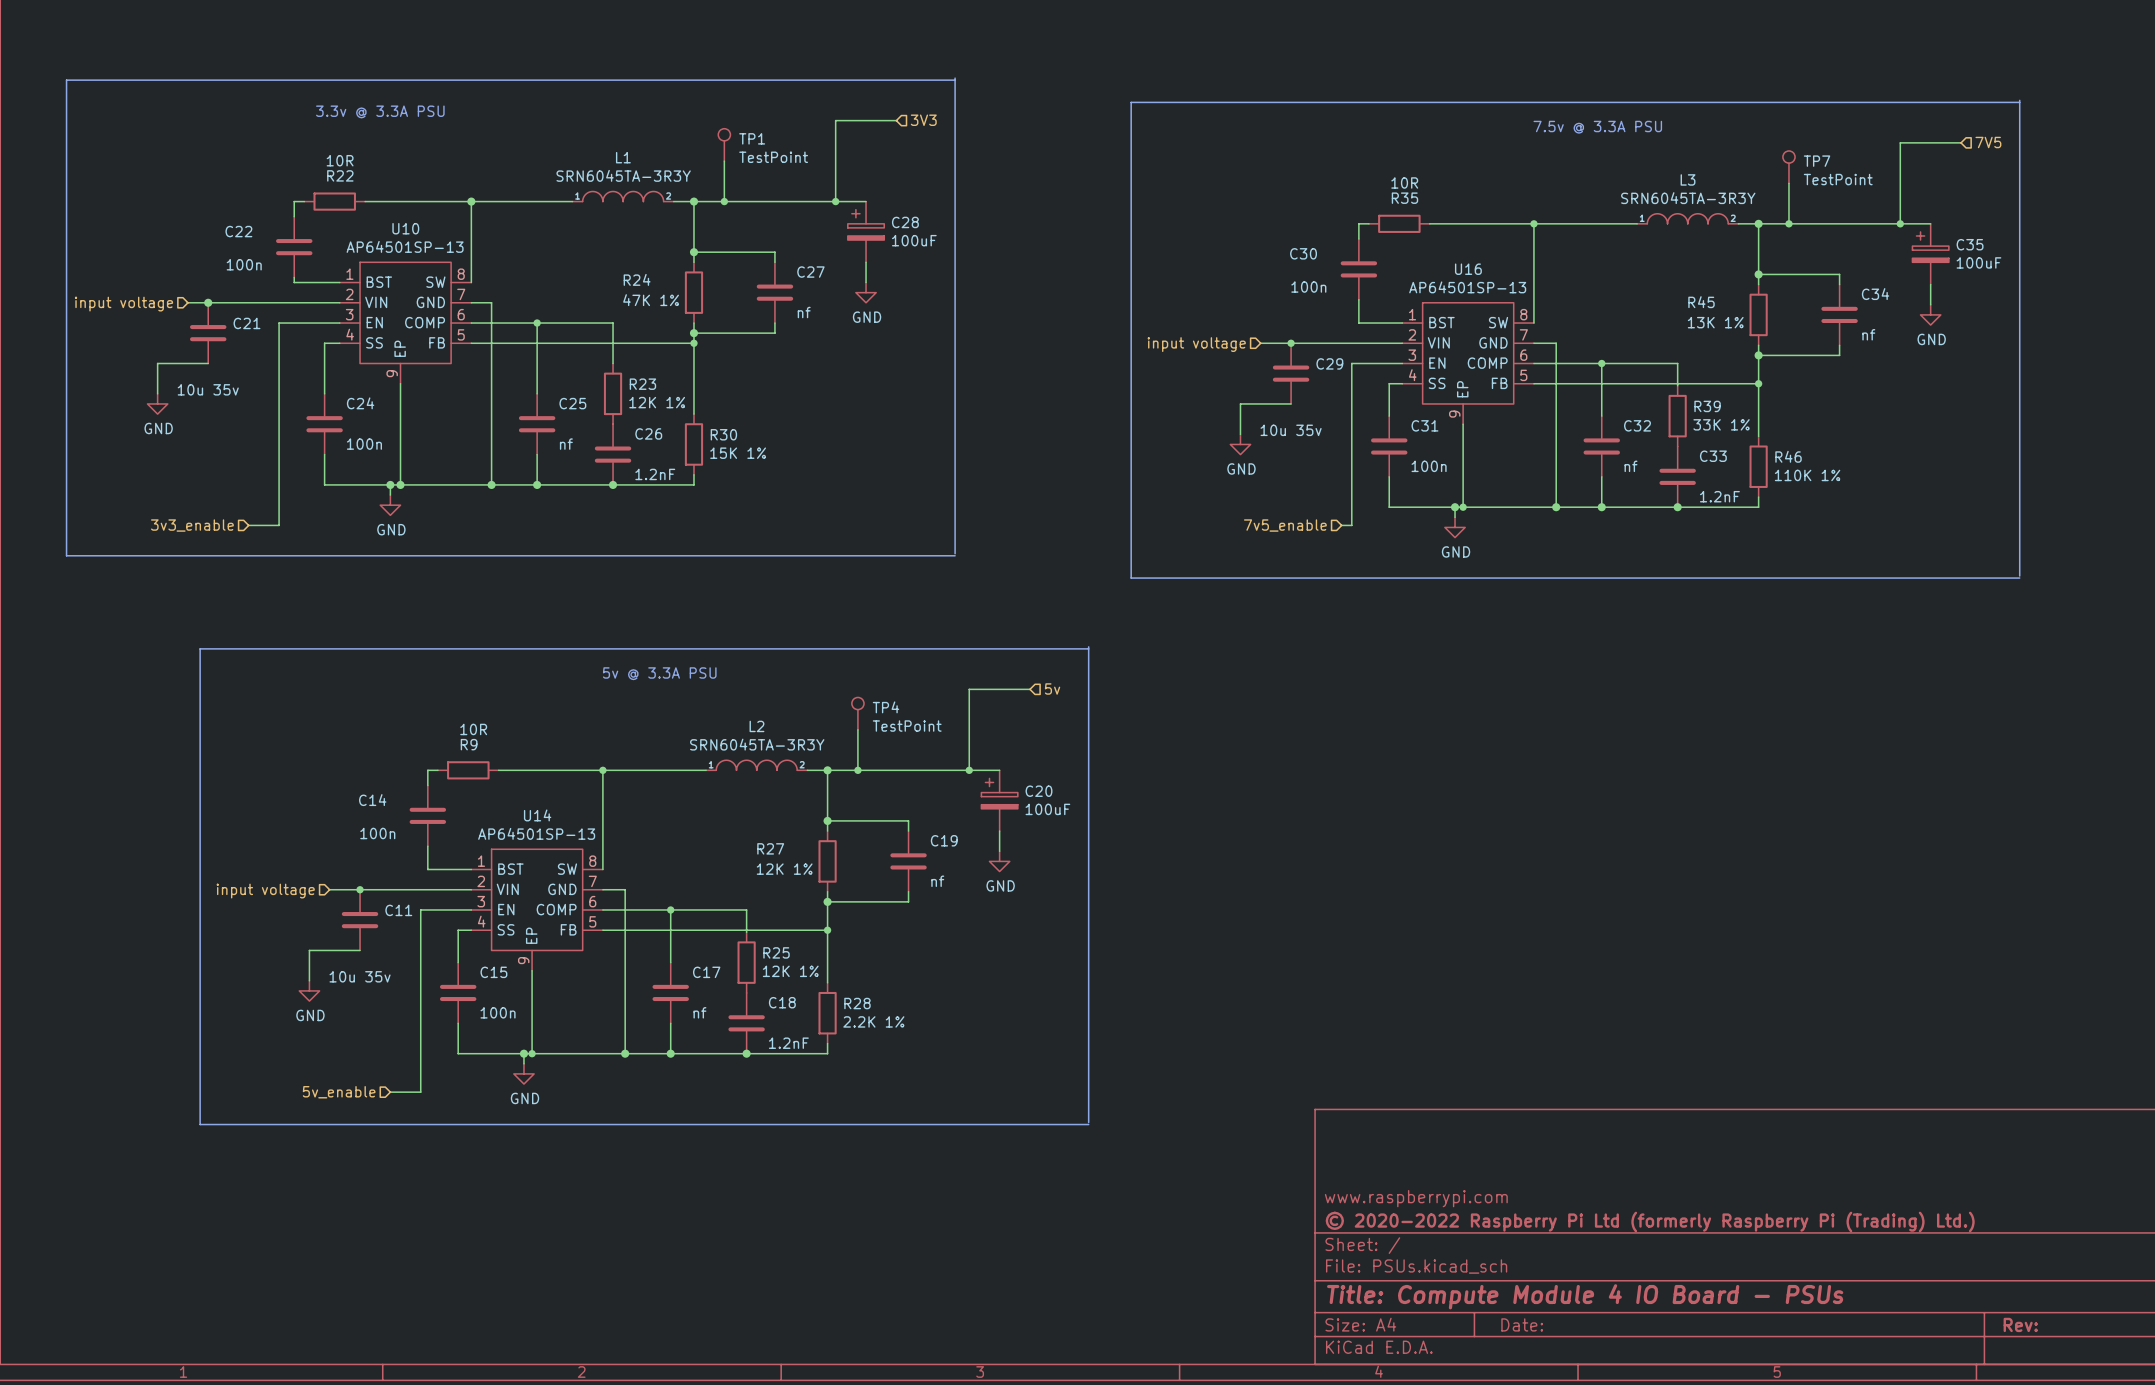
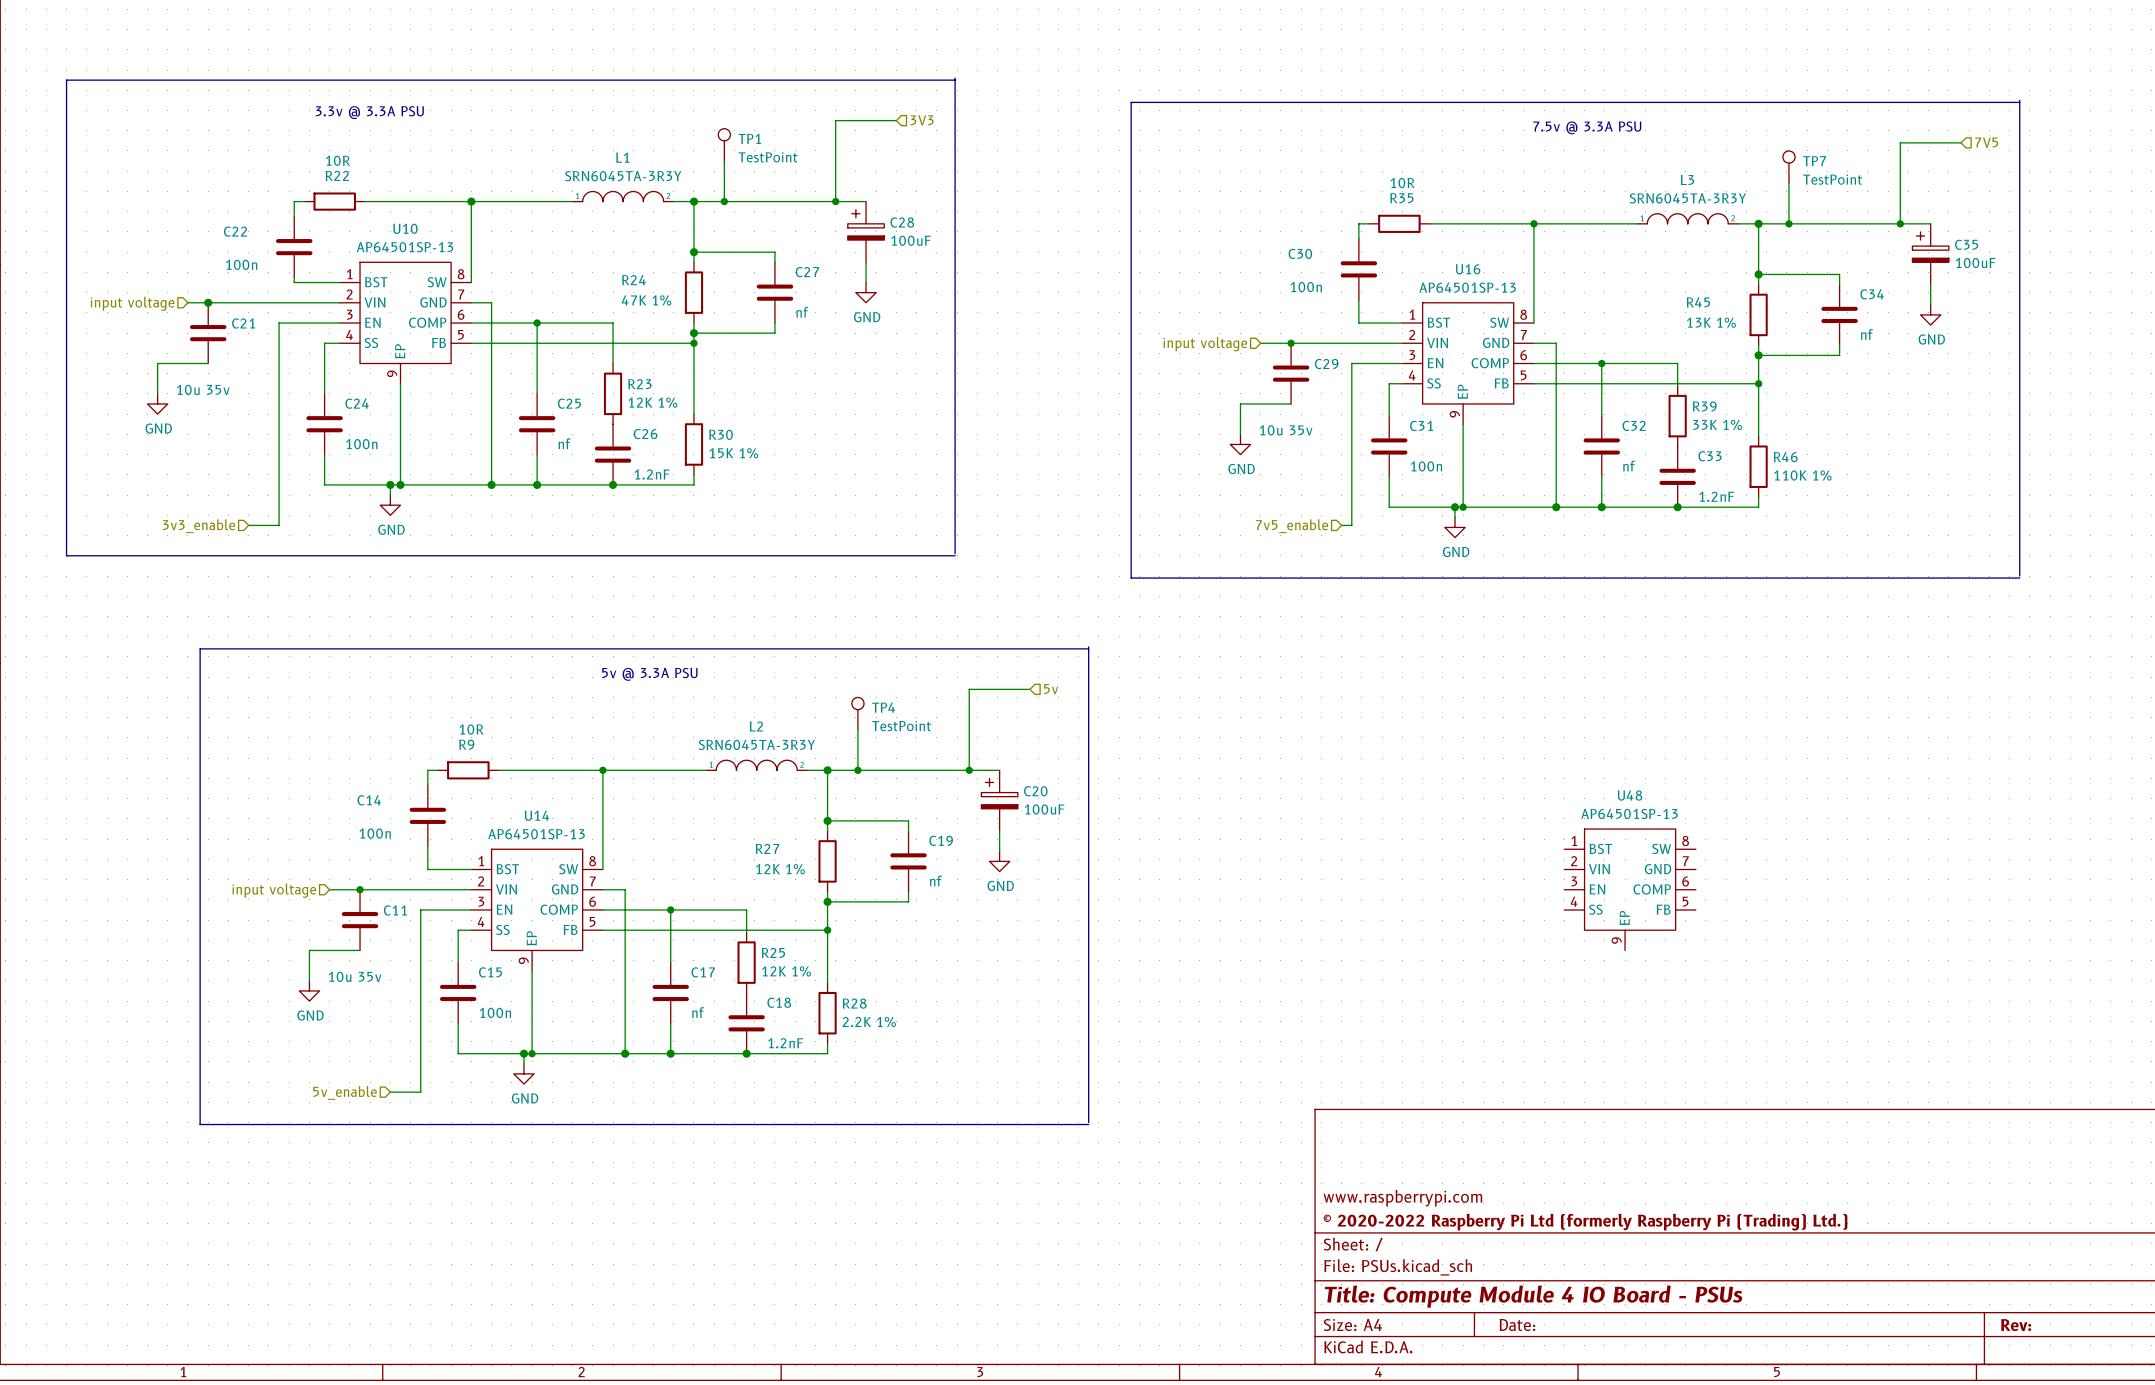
U48: none -> AP64501SP-13 (1630, 889)

